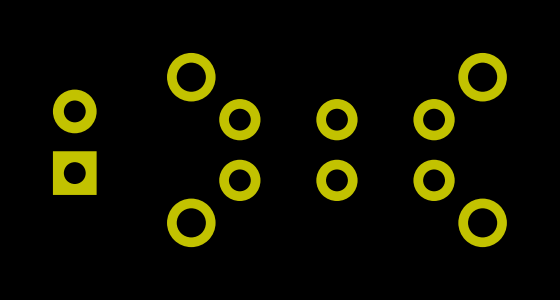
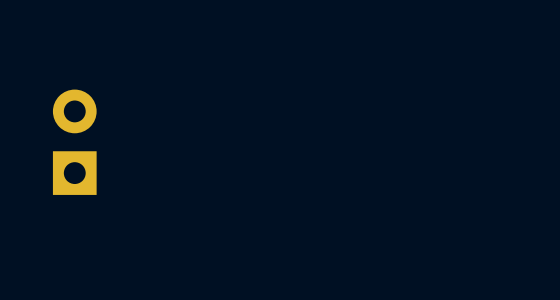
part: (336, 150) -> none

